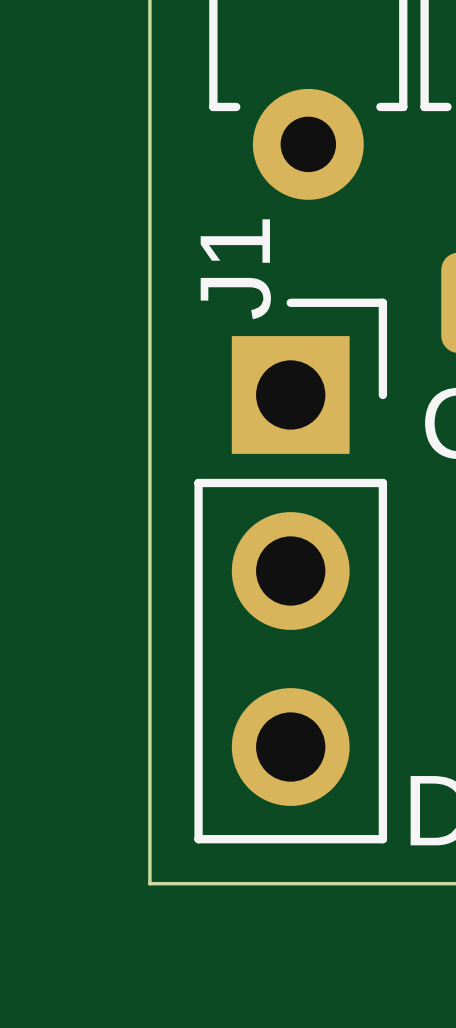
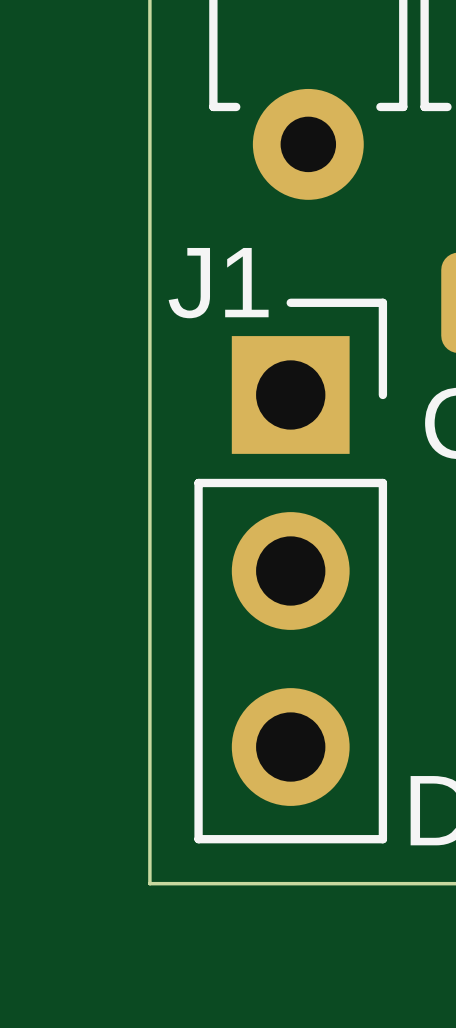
J1 name rotation: 0° (235, 269) -> 90° clockwise (218, 283)

